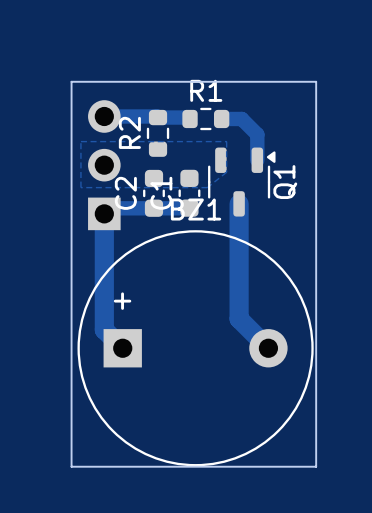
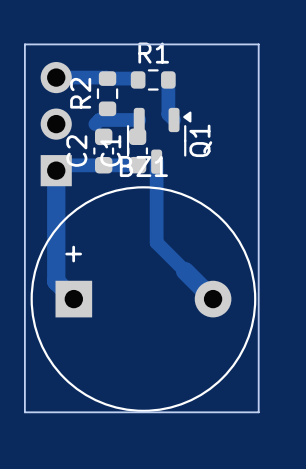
track: (221, 118) (241, 118) (257, 134) (257, 160) -> (168, 79) (168, 114) (174, 119)
zone outline: (80, 141) (226, 141) (226, 172) (207, 187) (80, 187) (80, 141) -> none
track: none -> (139, 119) (99, 119) (95, 124)
Q1 position: (241, 182) -> (159, 140)
track: (239, 203) (239, 318) -> (156, 161) (156, 242) (185, 271)

